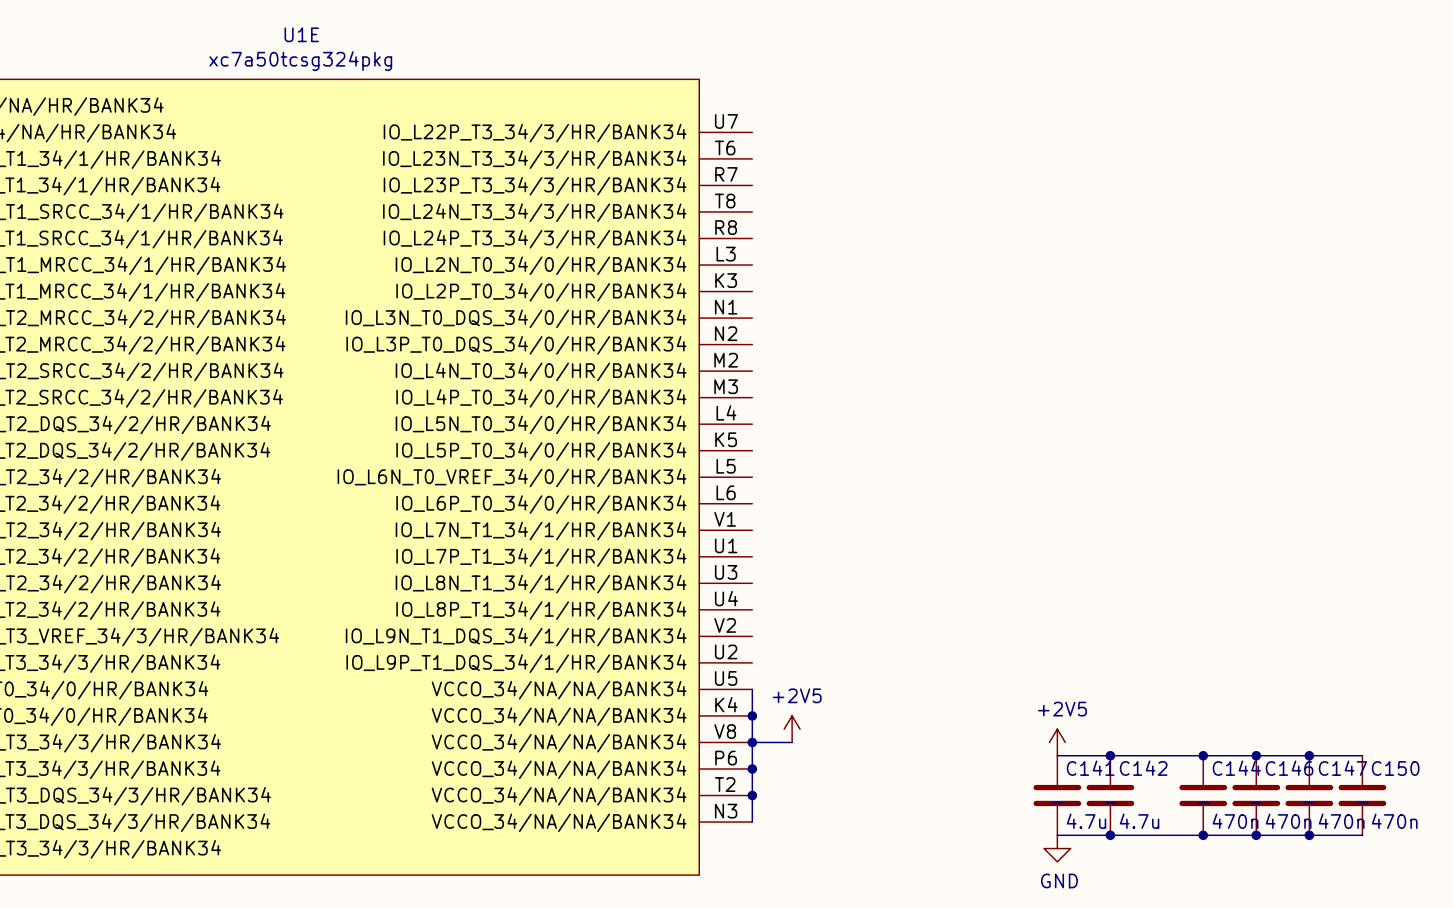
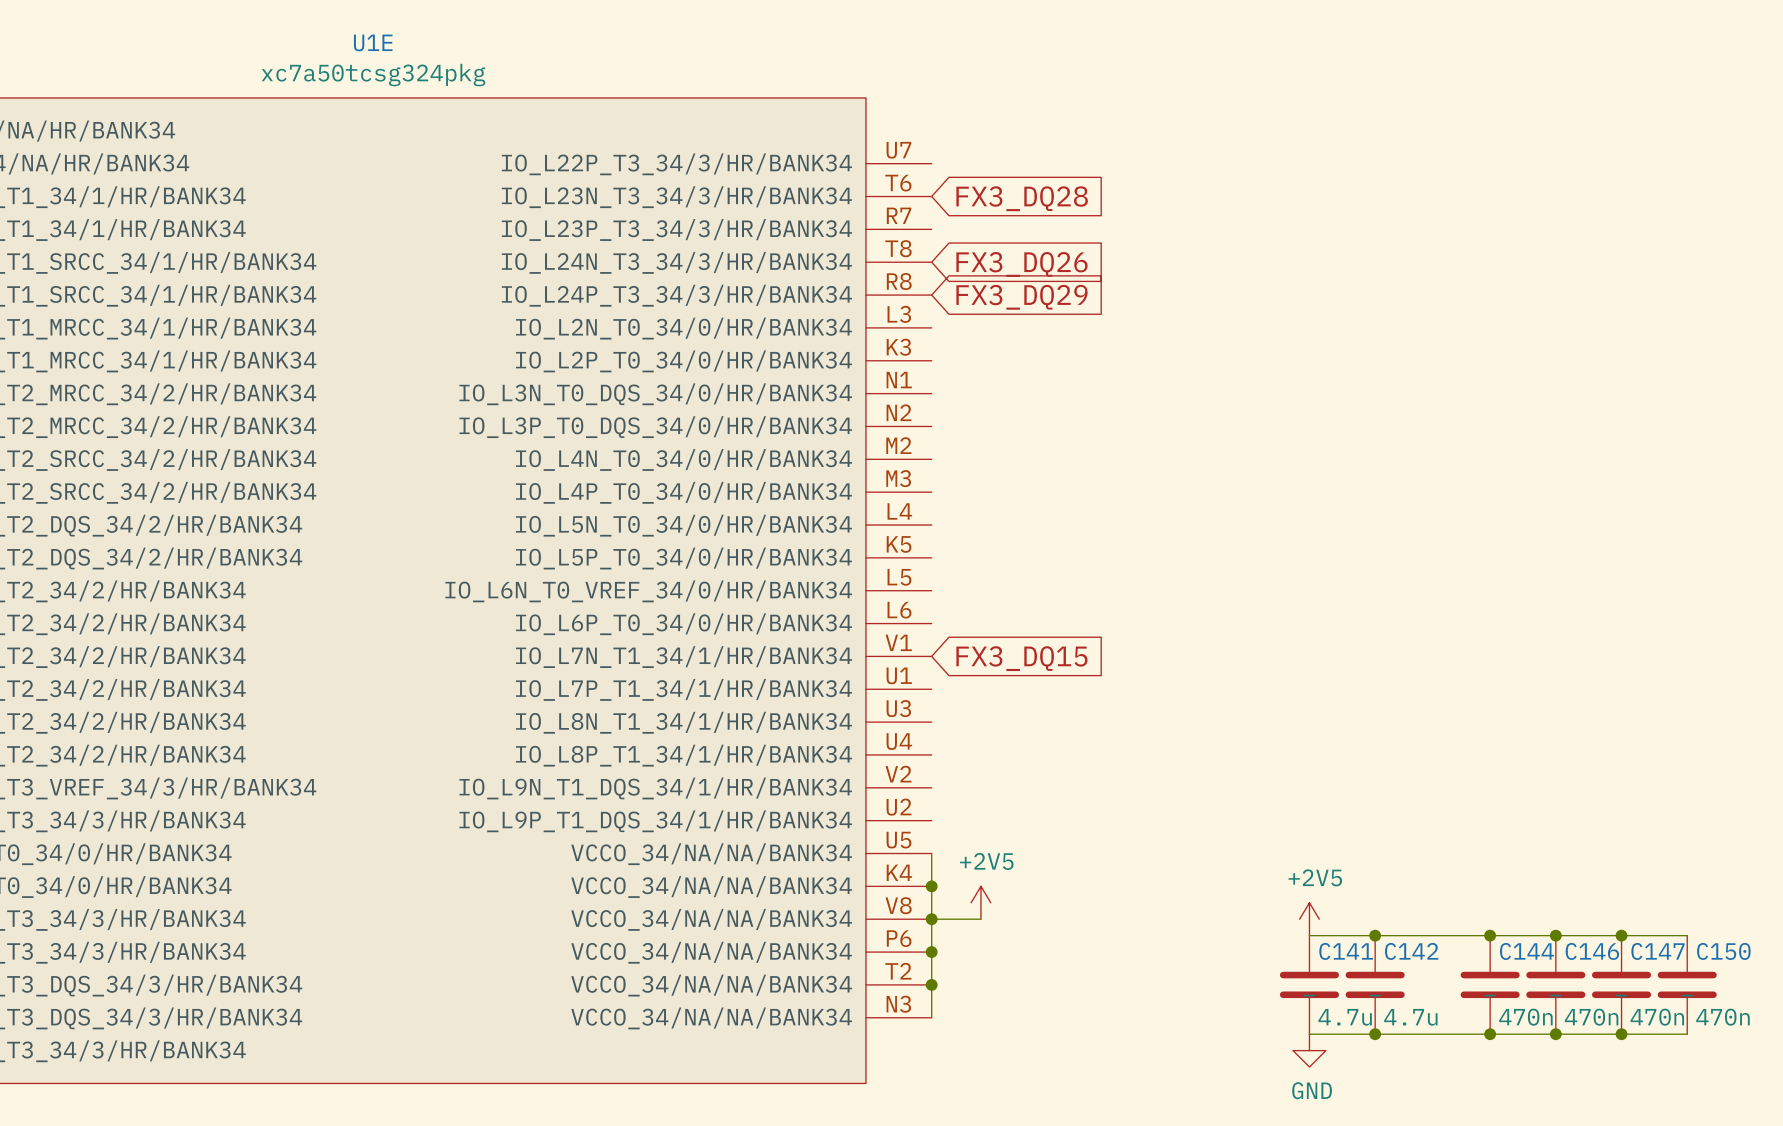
global label: none -> FX3_DQ28 (1022, 198)
global label: none -> FX3_DQ26 (1022, 264)
global label: none -> FX3_DQ29 (1022, 297)
global label: none -> FX3_DQ15 (1021, 658)

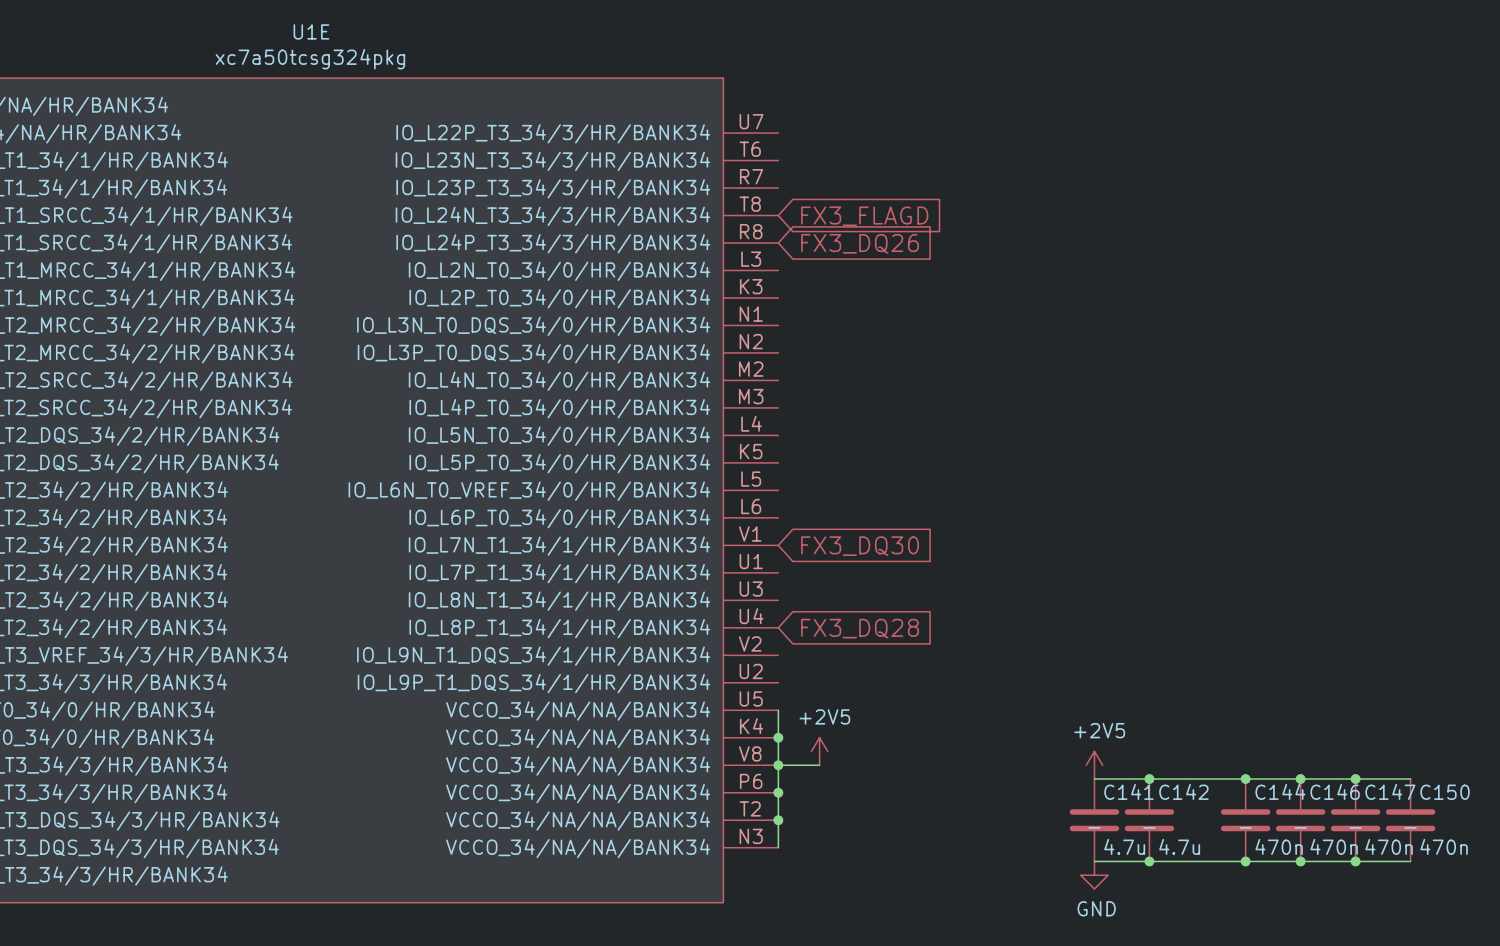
global label: FX3_DQ28 (1022, 198) -> none
global label: FX3_DQ26 (1022, 264) -> FX3_FLAGD (864, 216)
global label: FX3_DQ29 (1022, 297) -> FX3_DQ26 (860, 243)
global label: FX3_DQ15 (1021, 658) -> FX3_DQ30 (860, 546)
global label: none -> FX3_DQ28 (860, 628)

